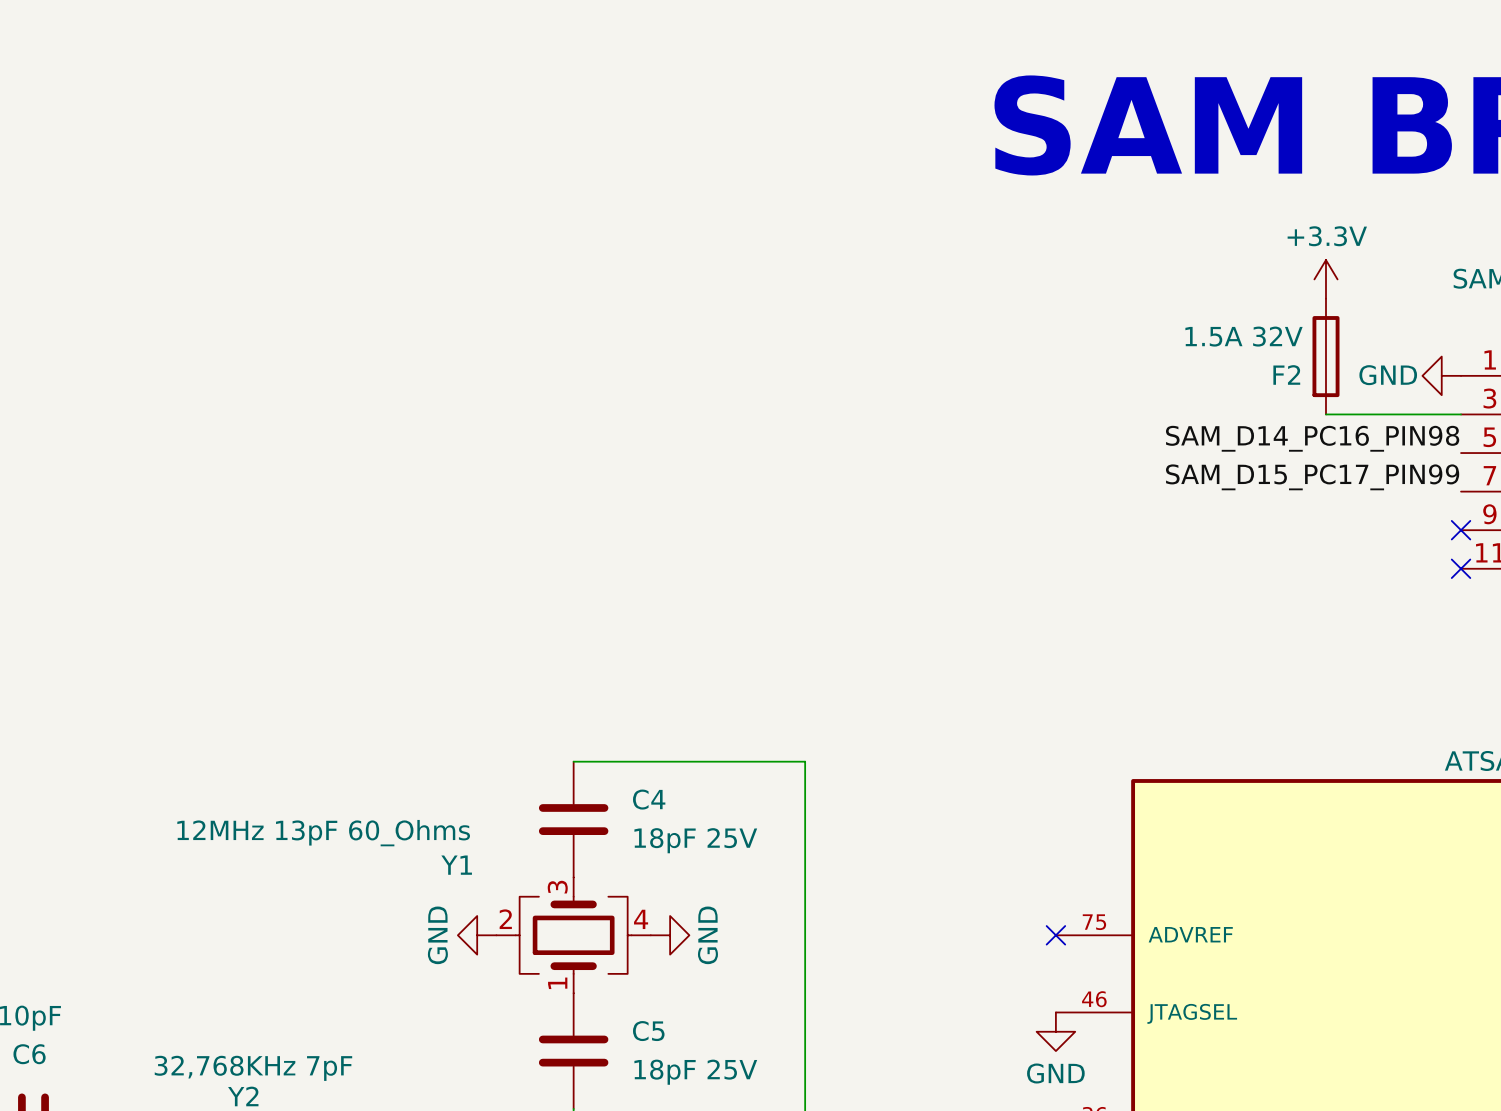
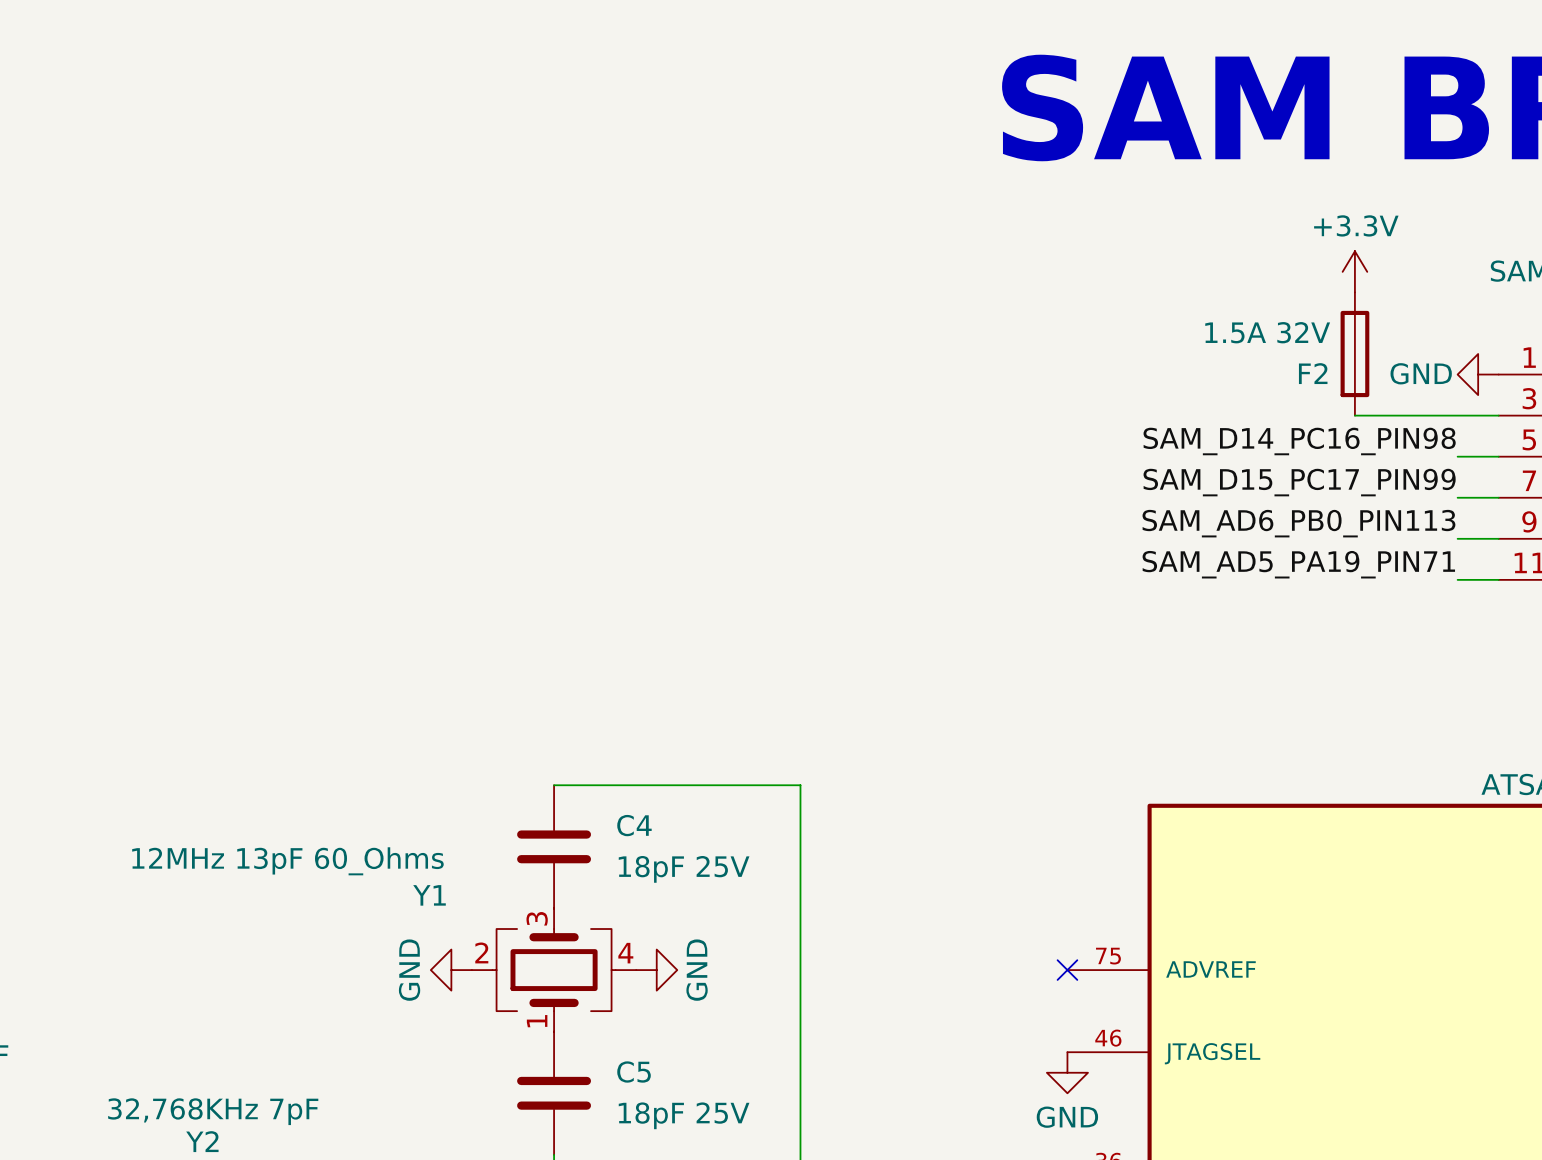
label position: SAM_D14_PC16_PIN98 (1312, 438) -> SAM_D14_PC16_PIN98 (1299, 441)
wire: none -> (1457, 456) (1498, 456)
label position: SAM_D15_PC17_PIN99 (1312, 477) -> SAM_D15_PC17_PIN99 (1299, 482)
wire: none -> (1457, 497) (1498, 497)
label: none -> SAM_AD6_PB0_PIN113 (1298, 523)
wire: none -> (1457, 538) (1498, 538)
no-connect mark: (1461, 530) -> none
label: none -> SAM_AD5_PA19_PIN71 (1298, 564)
wire: none -> (1457, 579) (1498, 579)
no-connect mark: (1461, 568) -> none

